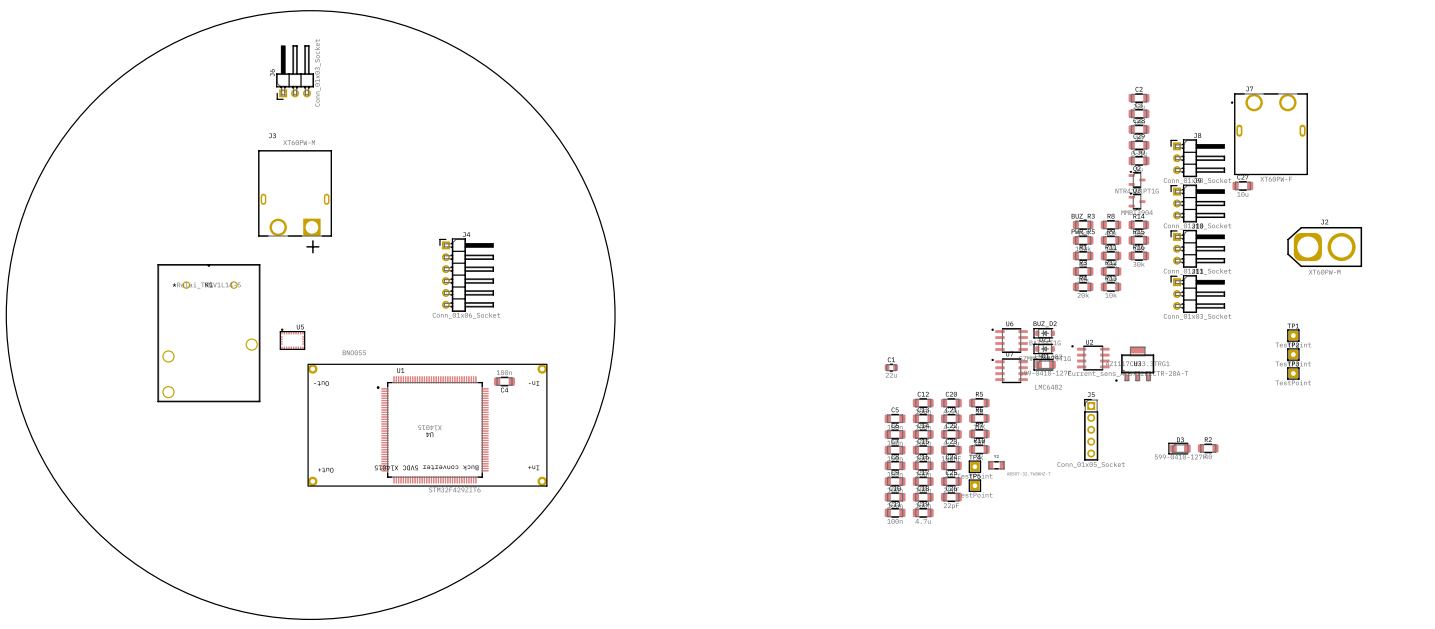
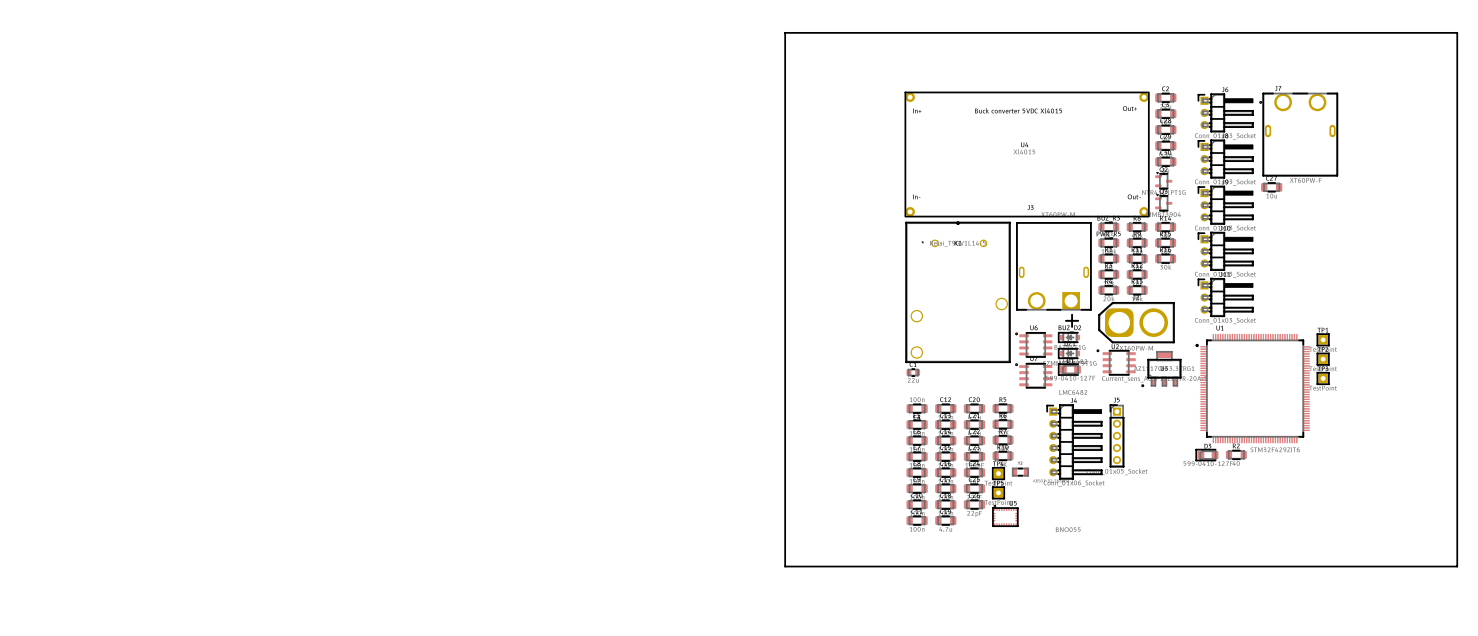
round board edge: [5, 10, 616, 620] -> none
board edge: none -> (785, 32) (1457, 32) (1457, 566) (785, 566) (785, 32)
part rotation: 0° (295, 72) -> 90° clockwise (1225, 112)
part position: (295, 72) -> (1225, 112)
part position: (295, 201) -> (1053, 274)
part position: (1324, 247) -> (1136, 322)
part position: (466, 275) -> (1074, 441)
part position: (208, 333) -> (958, 292)
part position: (292, 339) -> (1005, 515)
part position: (504, 381) -> (917, 408)
part rotation: 0° (427, 425) -> 180° (1027, 154)
part position: (427, 425) -> (1027, 154)
part position: (432, 429) -> (1252, 388)

